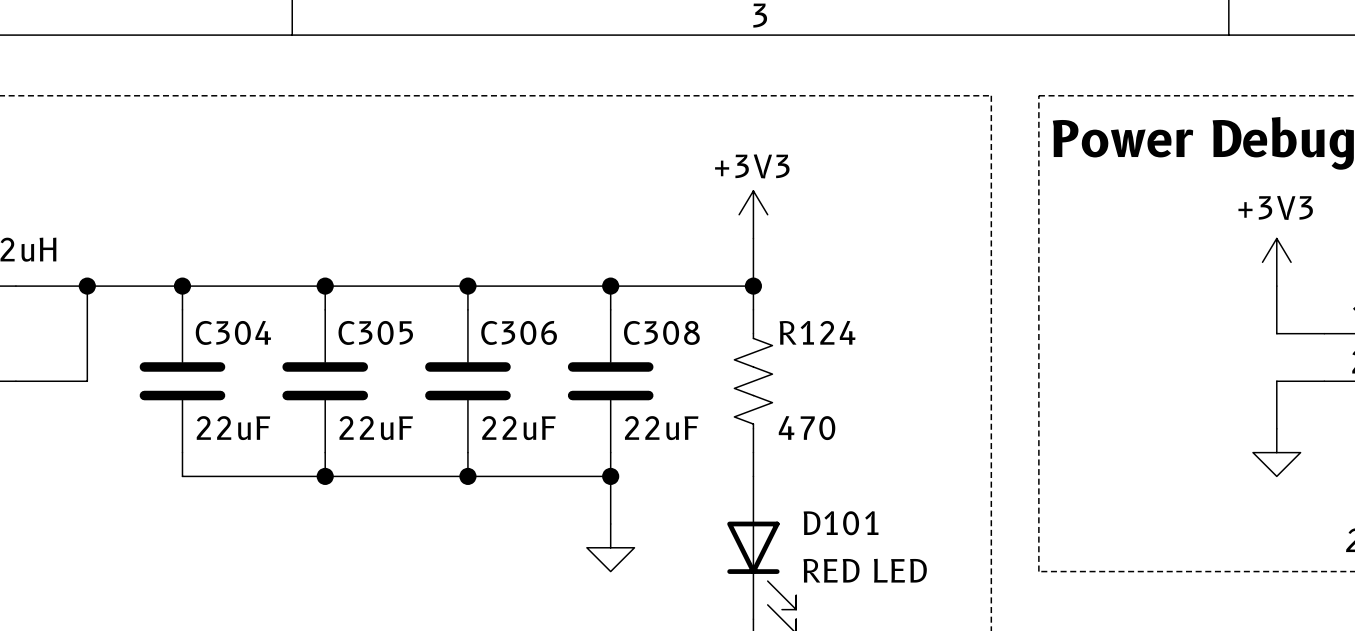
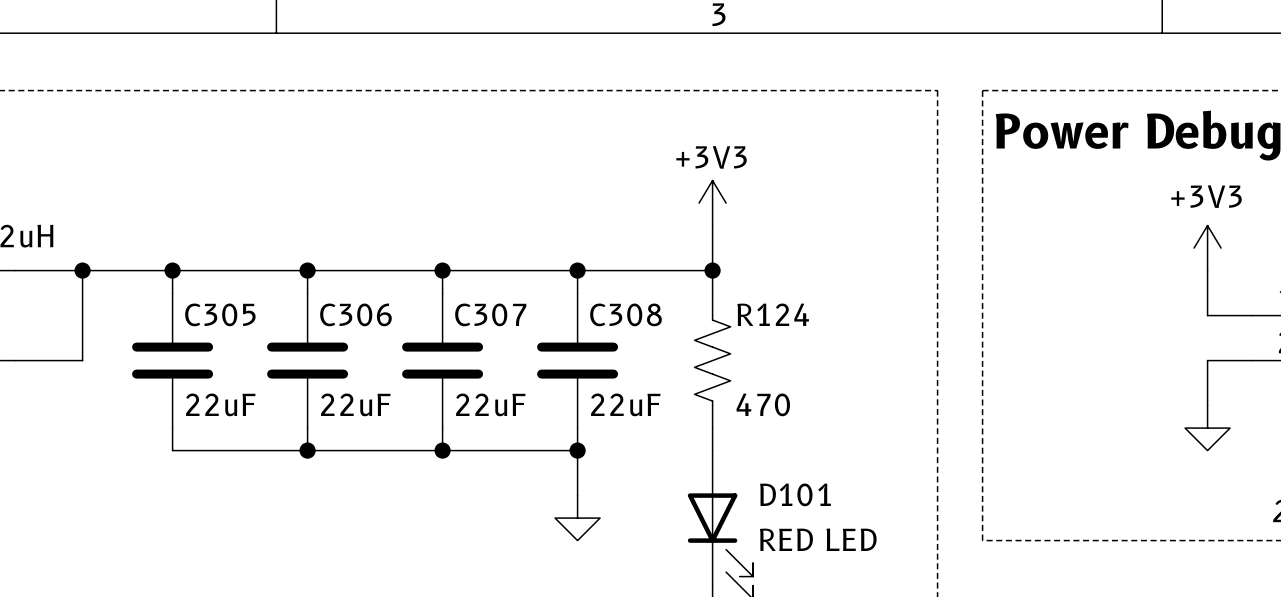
C304 name: C304 (233, 332) -> C305 (220, 314)
C305 name: C305 (375, 332) -> C306 (355, 314)
C306 name: C306 (519, 332) -> C307 (490, 314)

